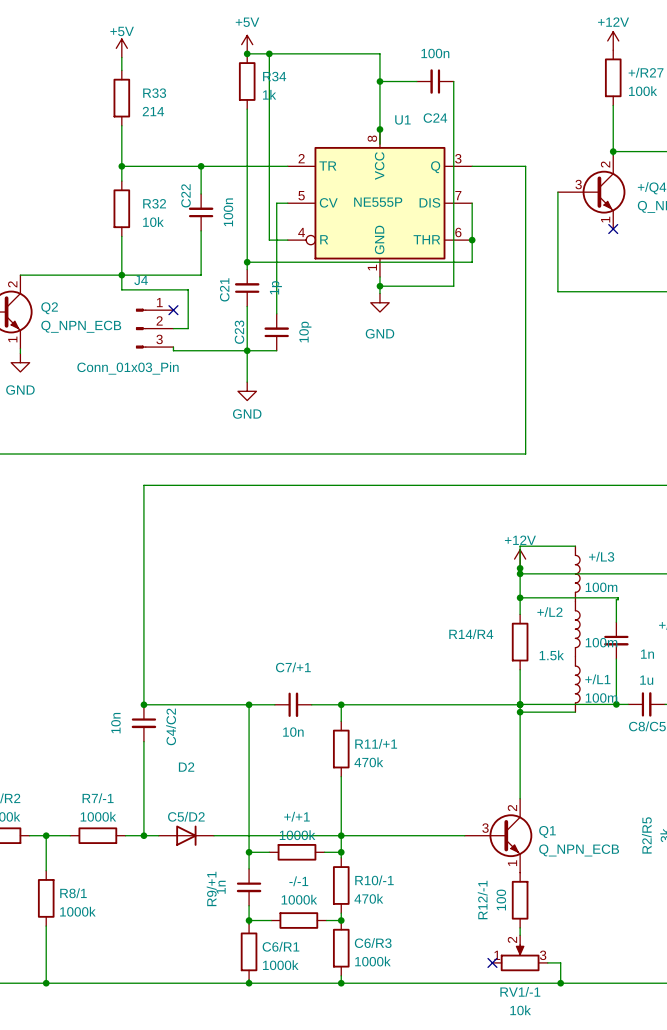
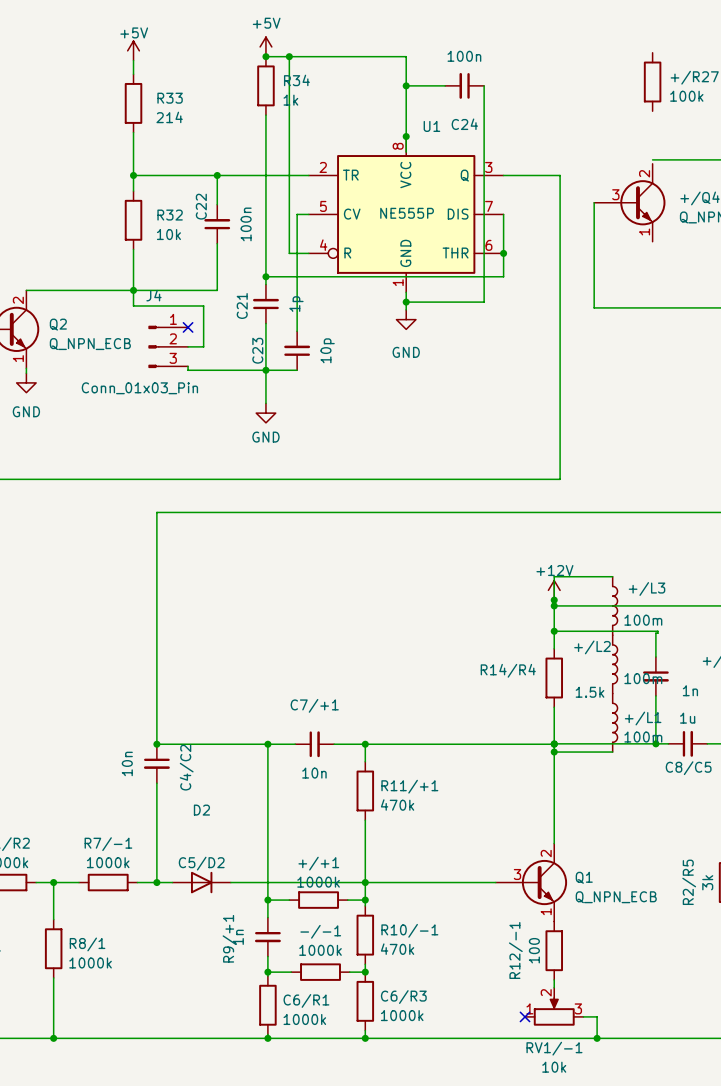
power symbol: +12V (613, 40) -> none
wire: (613, 105) (613, 155) -> none
junction: (613, 151) -> none
no-connect mark: (613, 229) -> none

